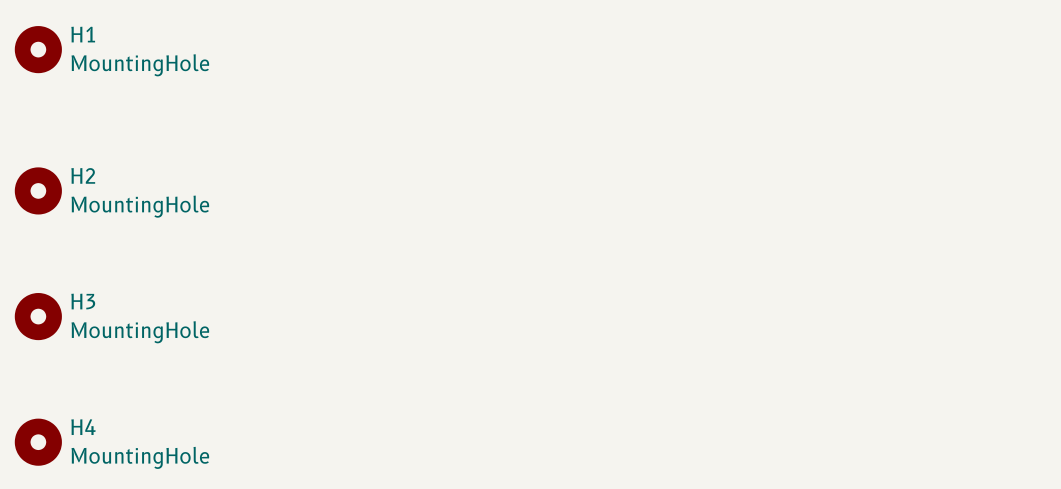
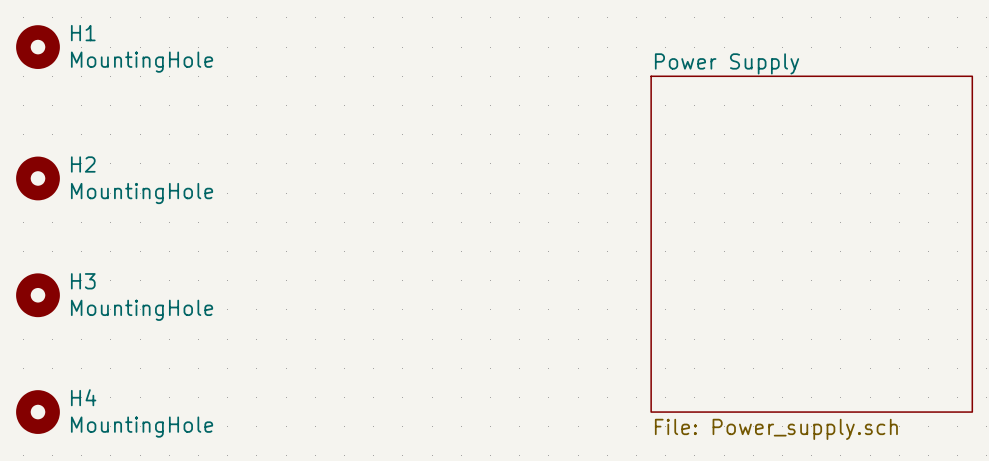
sheet Power Supply: none -> File: Power_supply.sch (811, 244)

